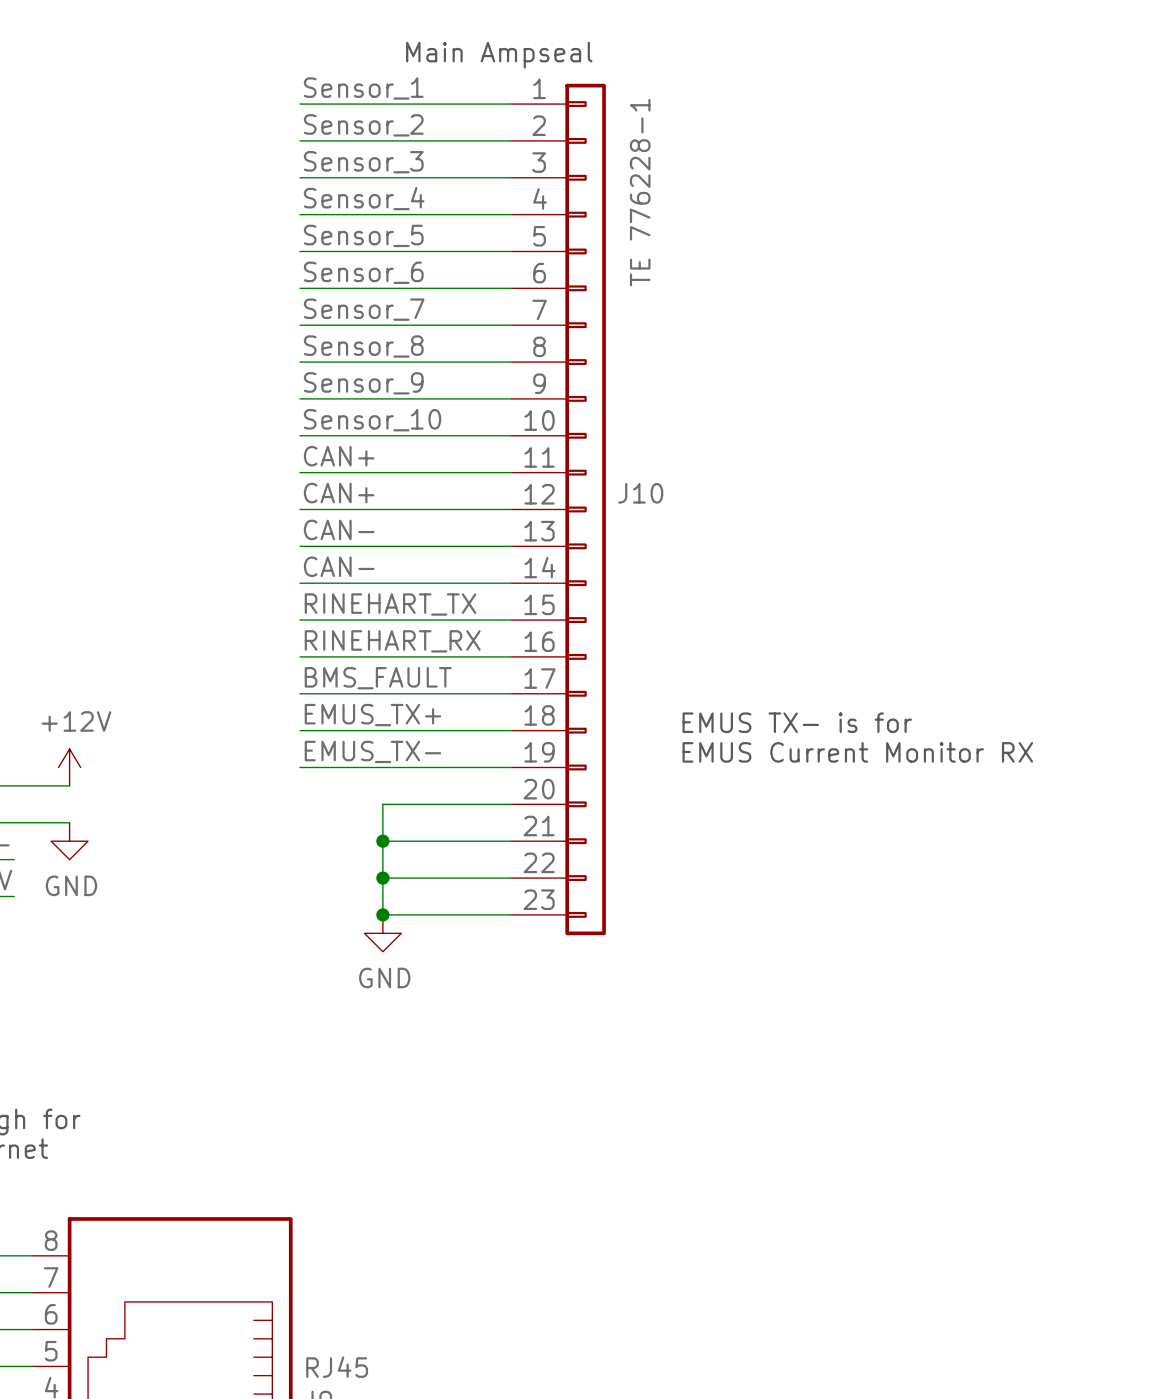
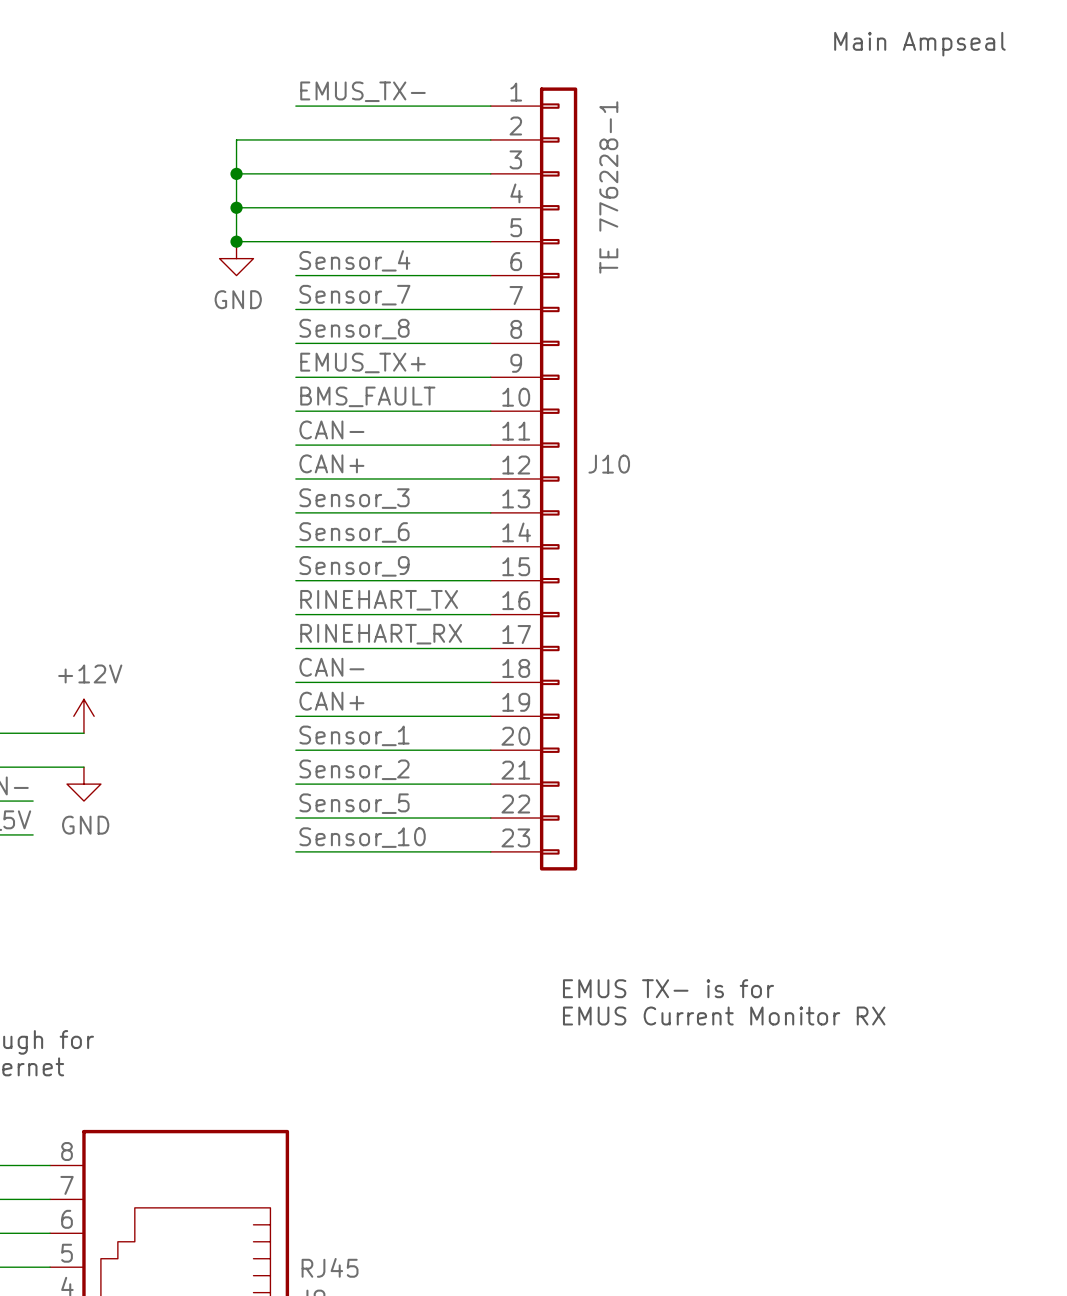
text: none -> Main Ampseal (919, 44)
text: Main Ampseal (499, 55) -> none
label: Sensor_1 (363, 88) -> EMUS_TX- (362, 91)
label: Sensor_2 (363, 125) -> none
wire: none -> (295, 139) (236, 139) (236, 241) (295, 241)
label: Sensor_3 (363, 162) -> none
wire: none -> (236, 173) (295, 173)
junction: none -> (236, 173)
label: Sensor_4 (364, 198) -> none
wire: none -> (236, 207) (295, 207)
junction: none -> (236, 207)
label: Sensor_5 (363, 235) -> none
junction: none -> (236, 241)
power symbol: none -> GND (236, 258)
label: Sensor_6 (363, 272) -> Sensor_4 (354, 260)
label: Sensor_9 (363, 383) -> EMUS_TX+ (362, 362)
label: Sensor_10 (372, 420) -> BMS_FAULT (367, 396)
label: CAN+ (339, 456) -> CAN- (331, 429)
label: CAN- (339, 529) -> Sensor_3 (354, 498)
label: CAN- (339, 566) -> Sensor_6 (354, 532)
label: RINEHART_TX (390, 604) -> Sensor_9 (354, 566)
label: RINEHART_RX (392, 641) -> RINEHART_TX (379, 600)
label: BMS_FAULT (378, 678) -> RINEHART_RX (381, 634)
label: EMUS_TX+ (372, 715) -> CAN- (331, 667)
text position: EMUS TX- is for (797, 722) -> EMUS TX- is for (668, 988)
label: EMUS_TX- (372, 751) -> CAN+ (331, 701)
text position: EMUS Current Monitor RX (857, 752) -> EMUS Current Monitor RX (724, 1016)
label: none -> Sensor_1 (354, 735)
wire: (382, 804) (382, 914) -> (372, 750) (295, 750)
label: none -> Sensor_2 (354, 769)
wire: none -> (295, 784) (372, 784)
junction: (382, 841) -> none
label: none -> Sensor_5 (354, 803)
wire: none -> (295, 818) (372, 818)
junction: (382, 878) -> none
label: none -> Sensor_10 (362, 837)
wire: none -> (295, 851) (372, 851)
junction: (382, 914) -> none
power symbol: GND (382, 933) -> none

